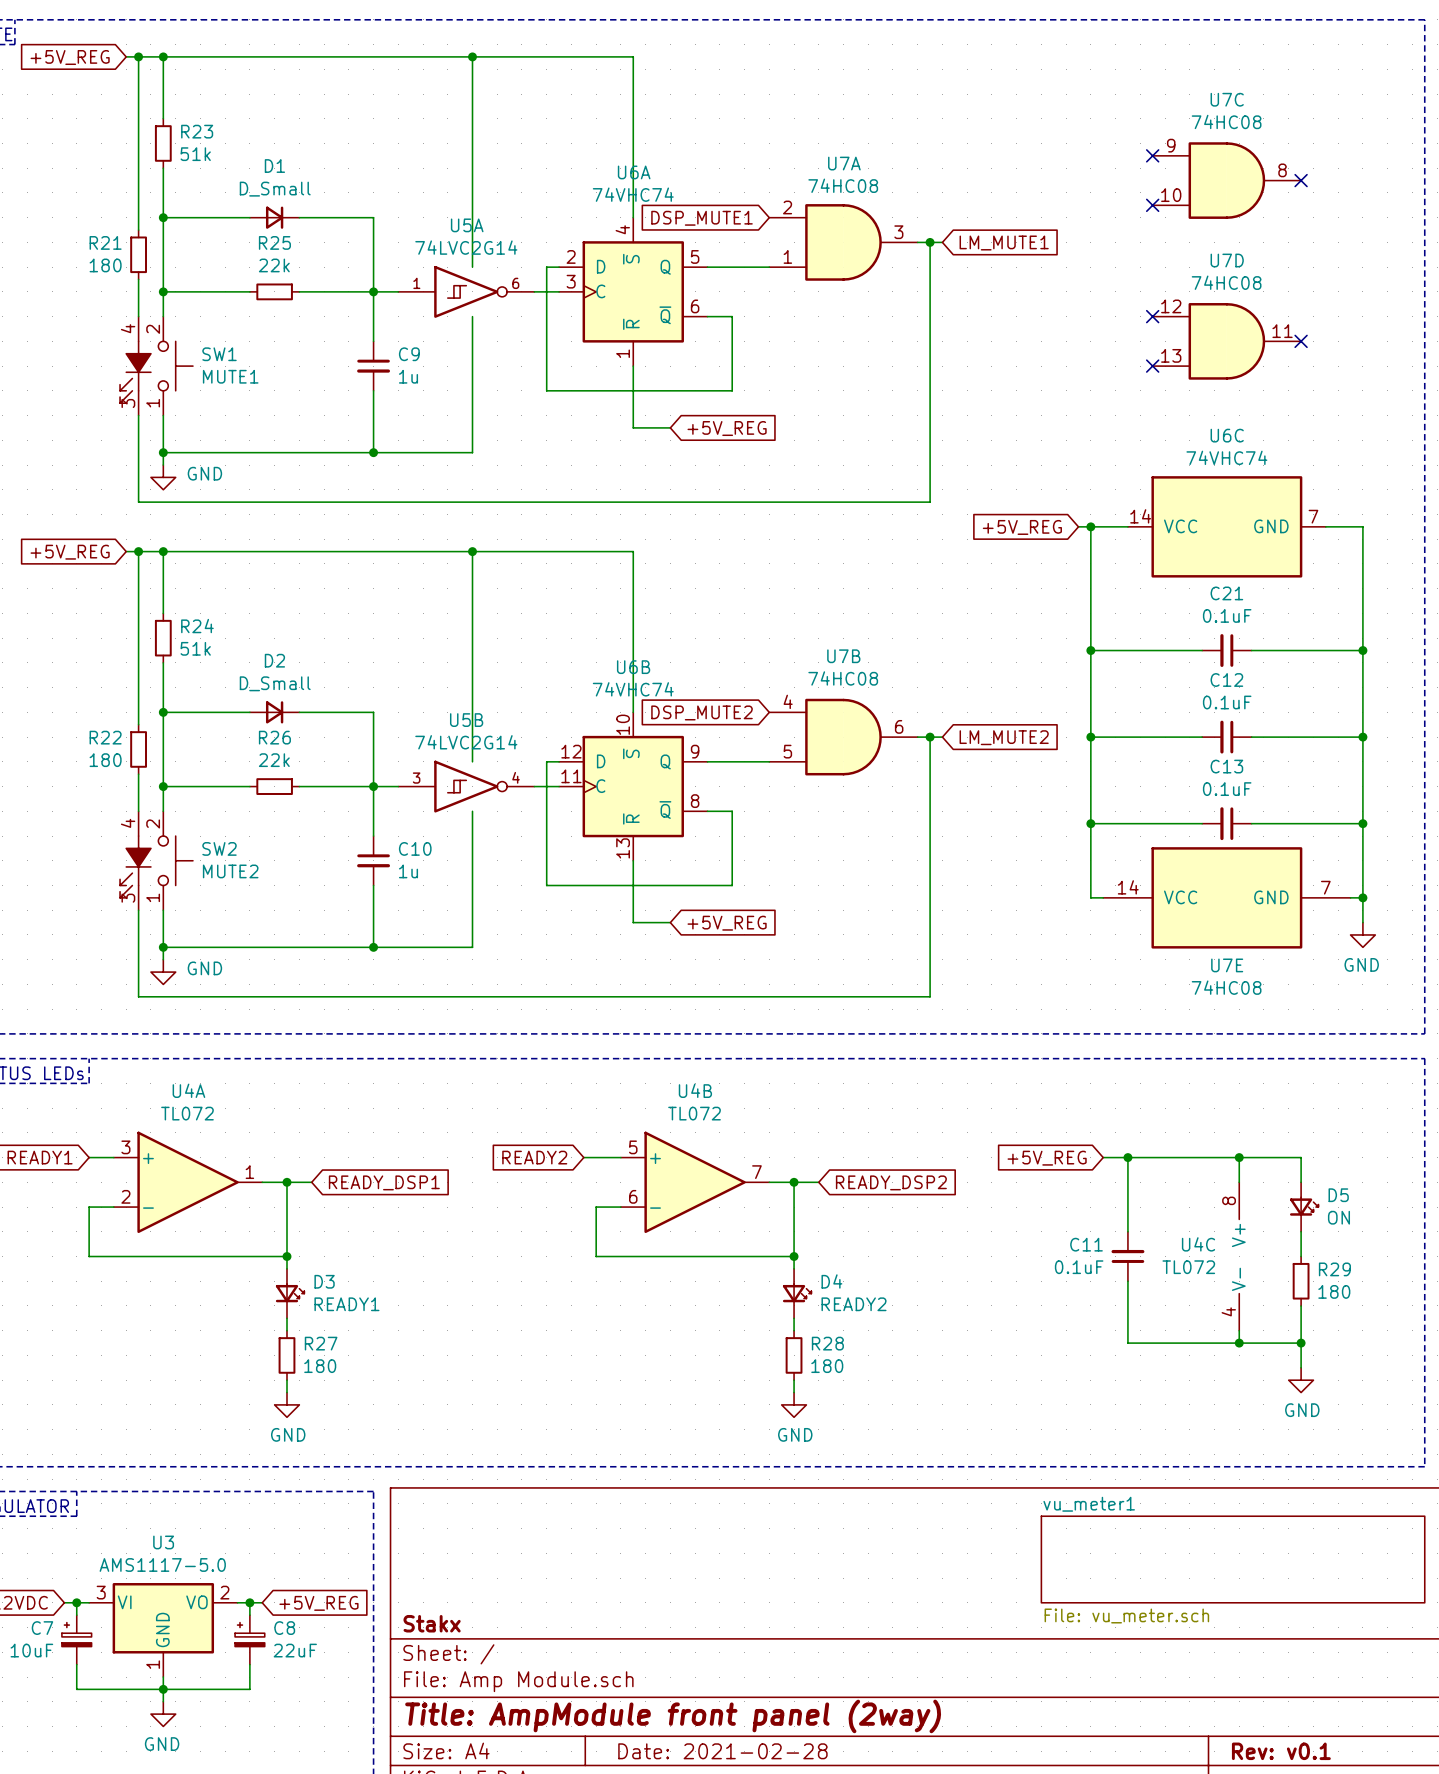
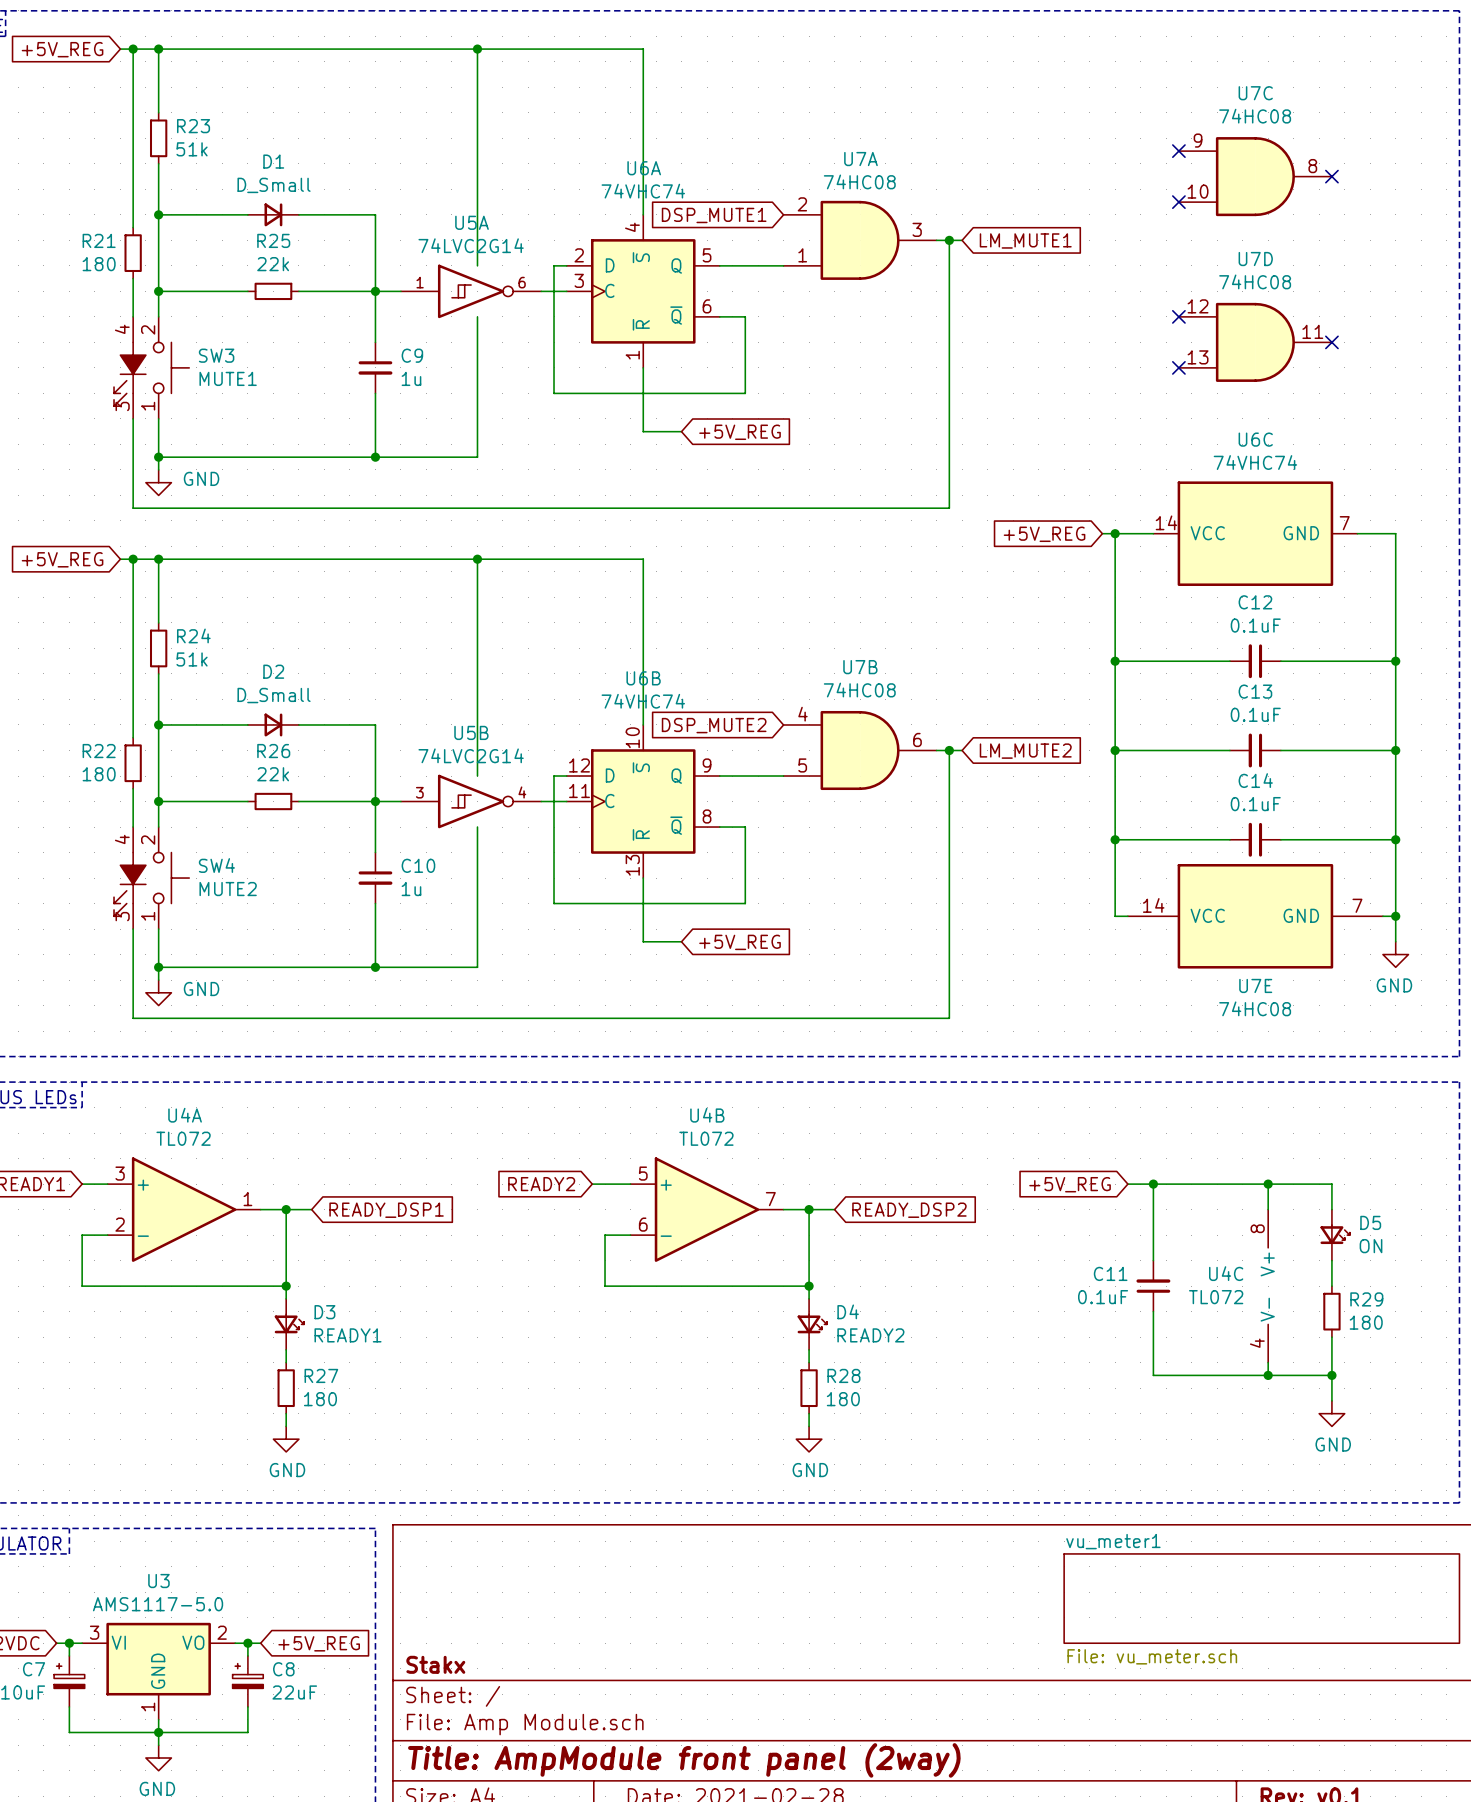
SW1 name: SW1 (219, 354) -> SW3 (216, 355)
C21 name: C21 (1226, 593) -> C12 (1255, 602)
C12 name: C12 (1226, 680) -> C13 (1255, 691)
C13 name: C13 (1226, 766) -> C14 (1255, 780)
SW2 name: SW2 (219, 848) -> SW4 (216, 865)

